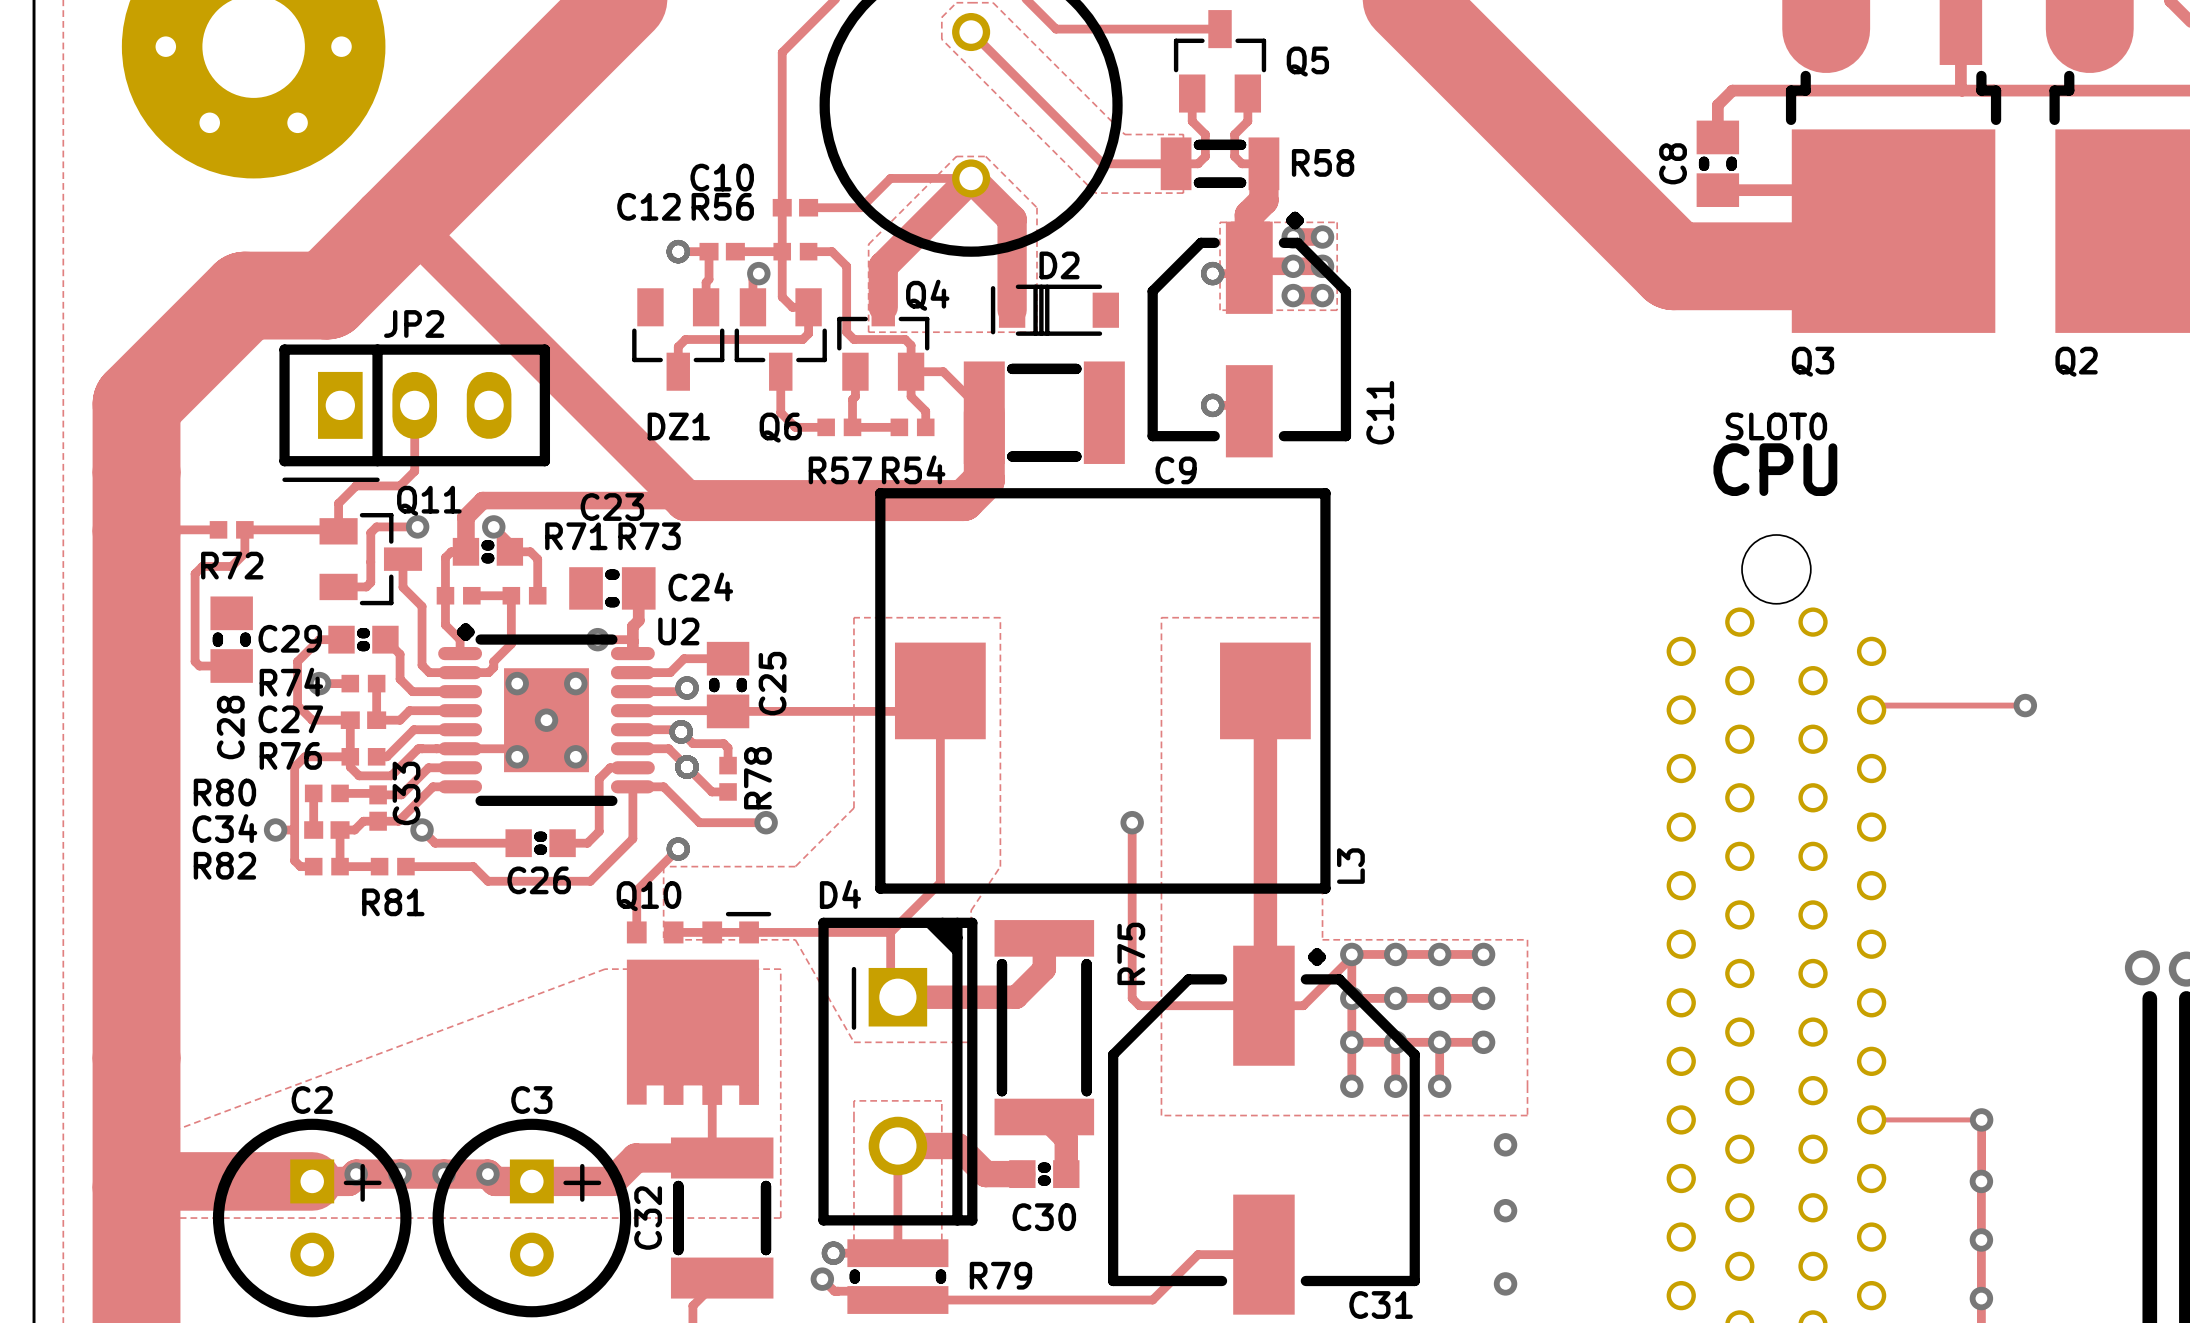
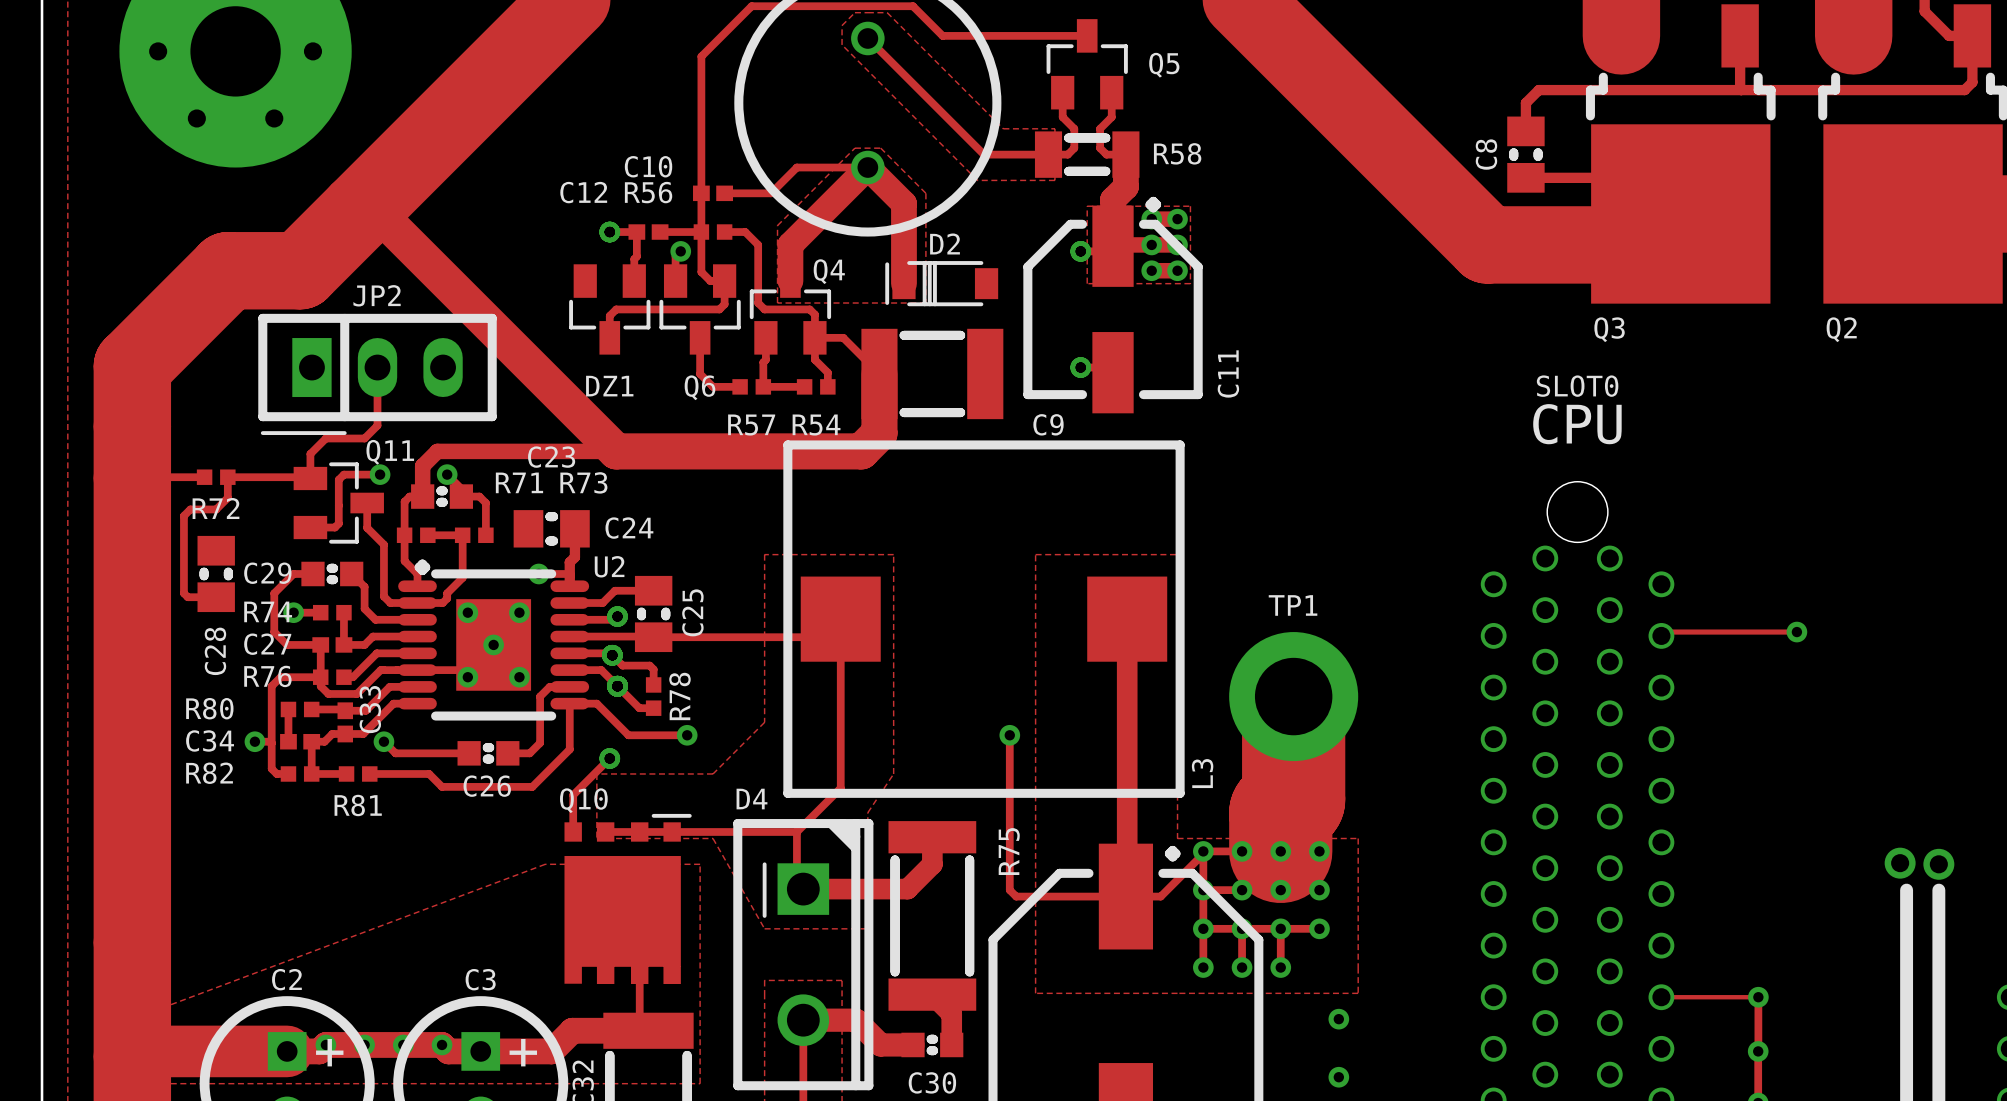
track: none -> (1293, 696) (1293, 799) (1280, 812) (1280, 851)
TP1: none -> (1293, 696)

